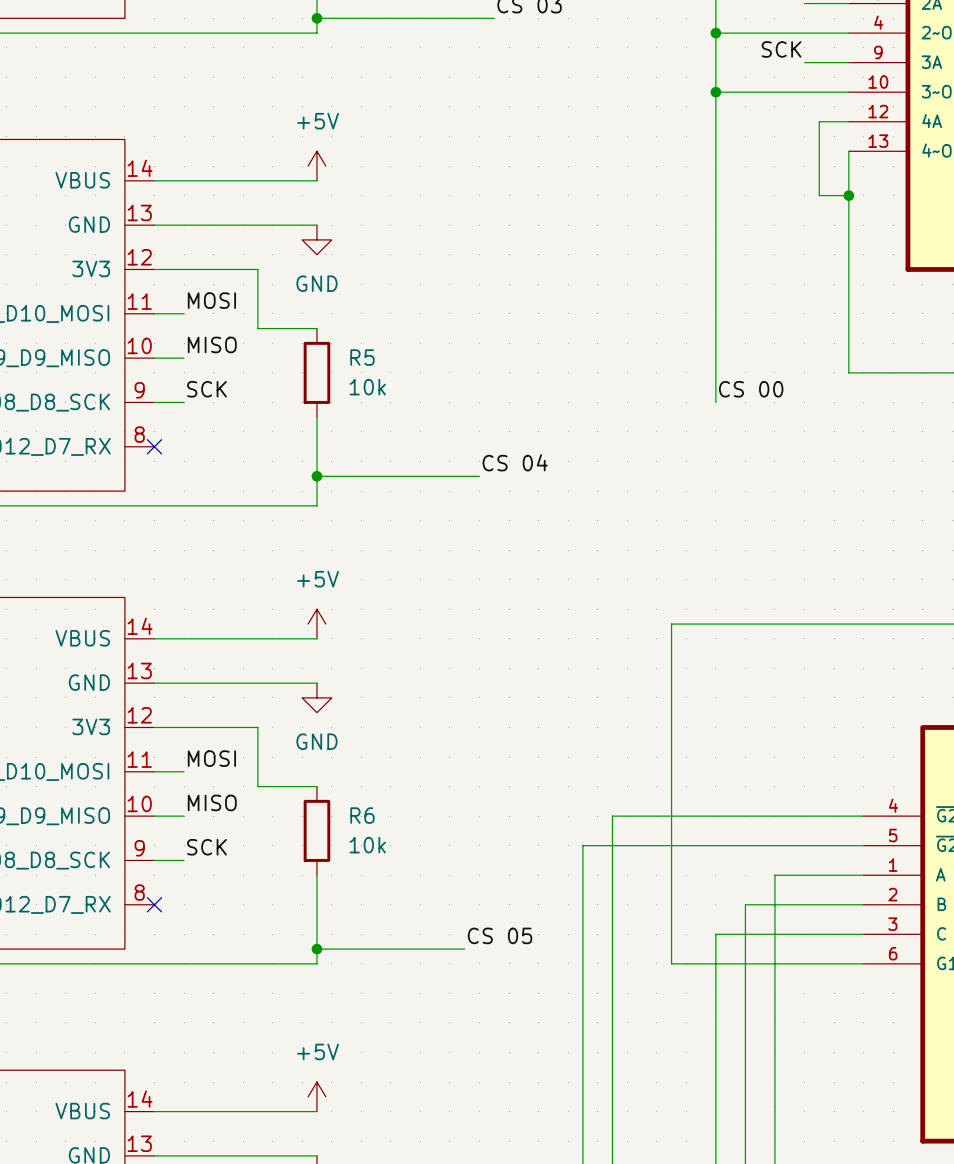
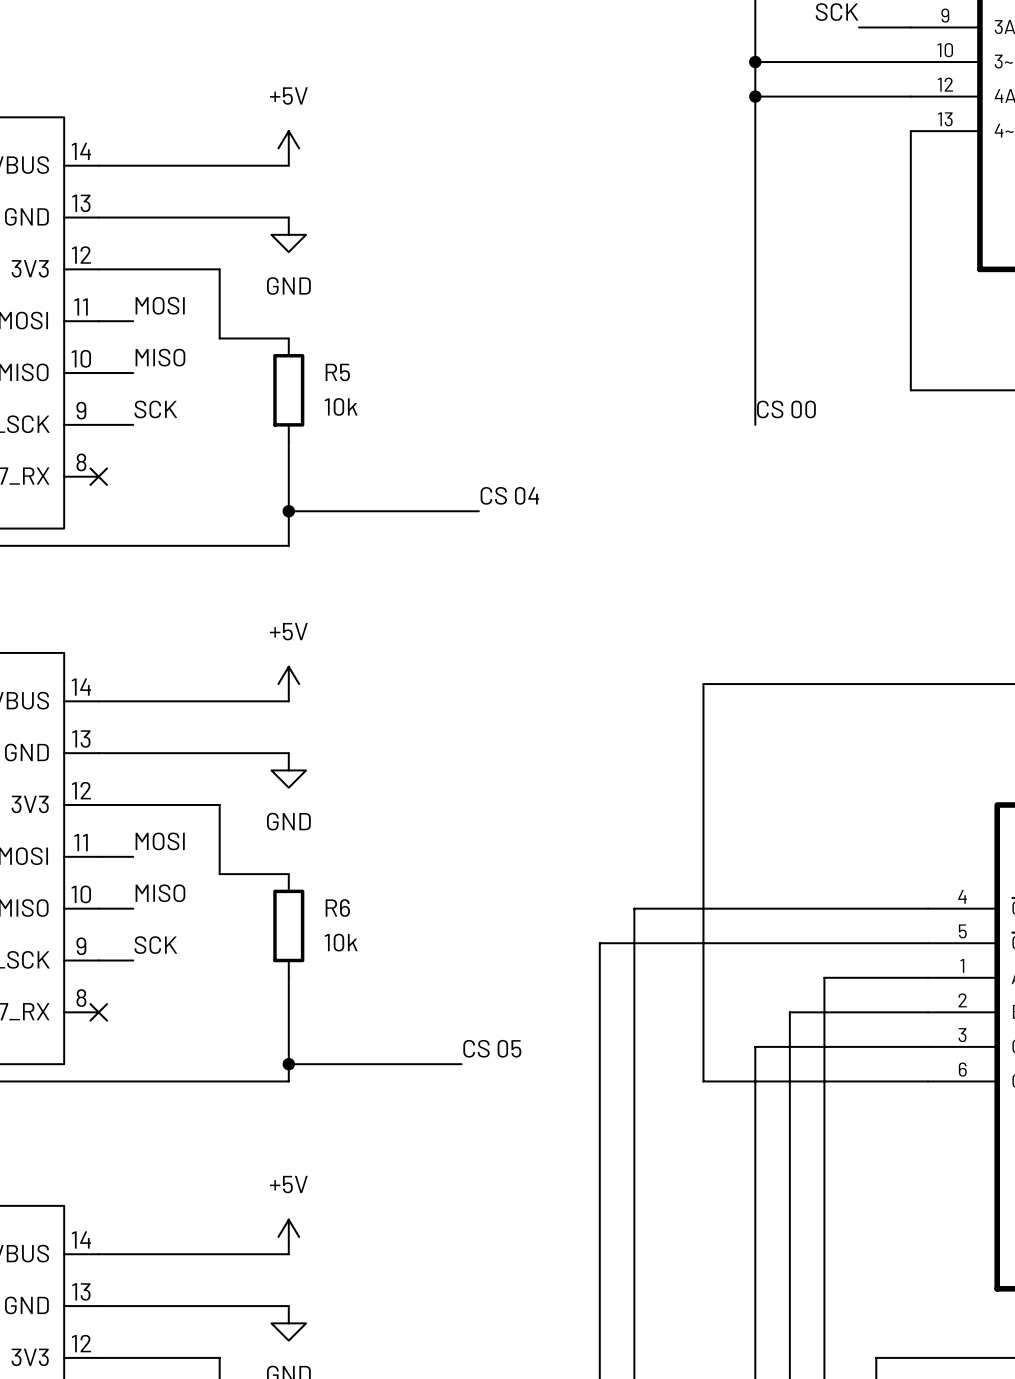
junction: none -> (755, 96)
wire: (819, 121) (819, 195) (848, 195) -> (876, 96) (755, 96)
junction: (848, 195) -> none

